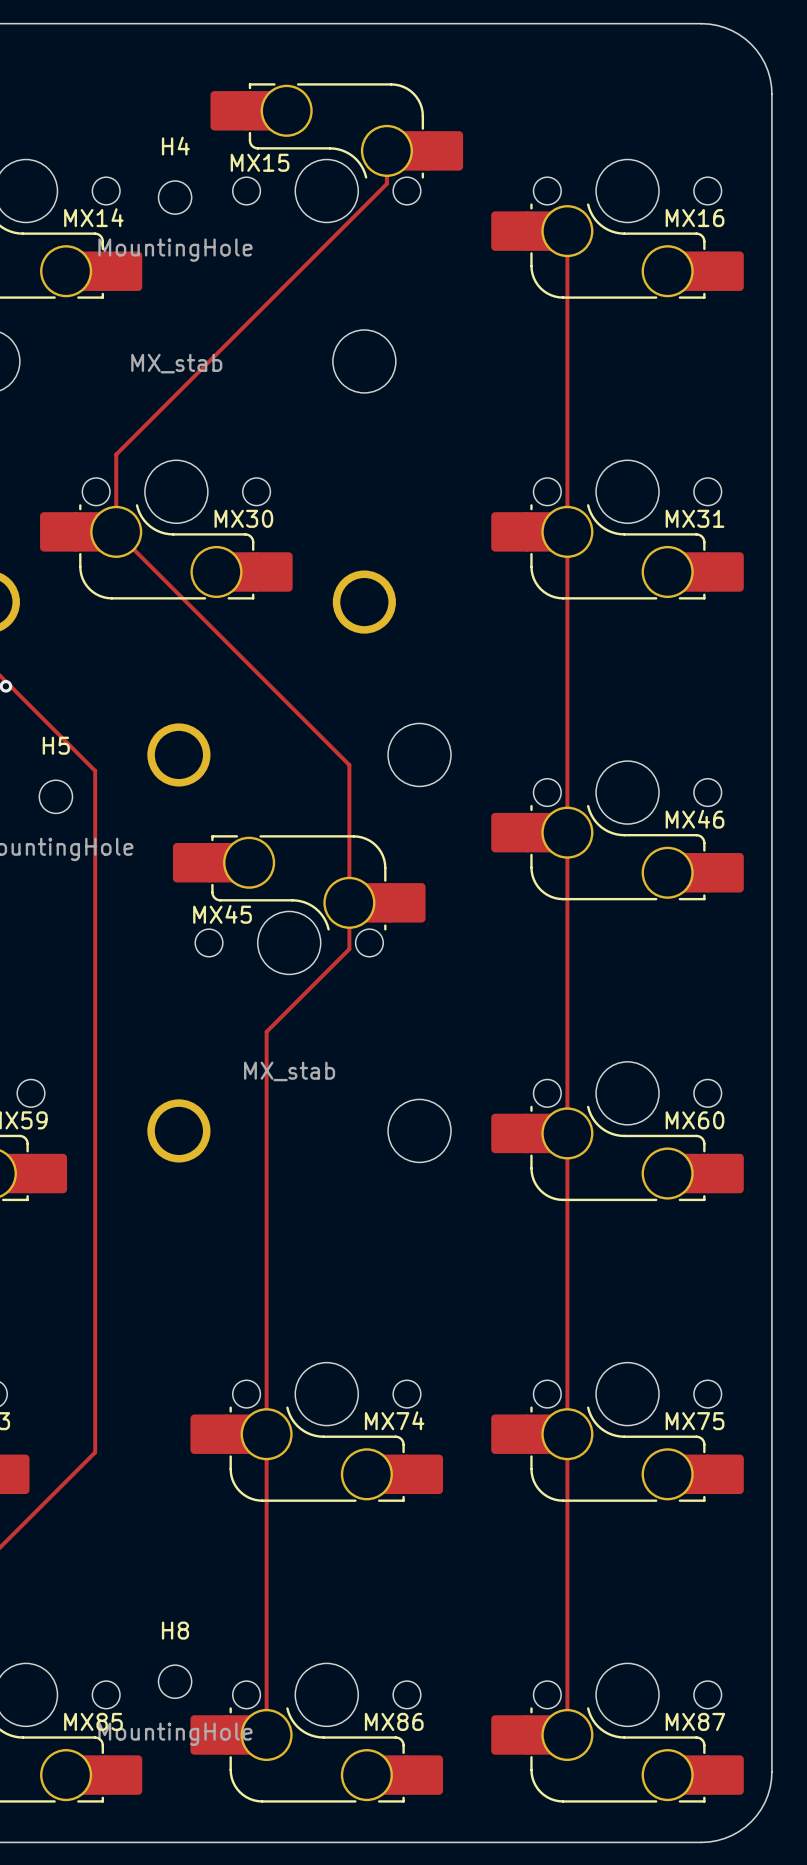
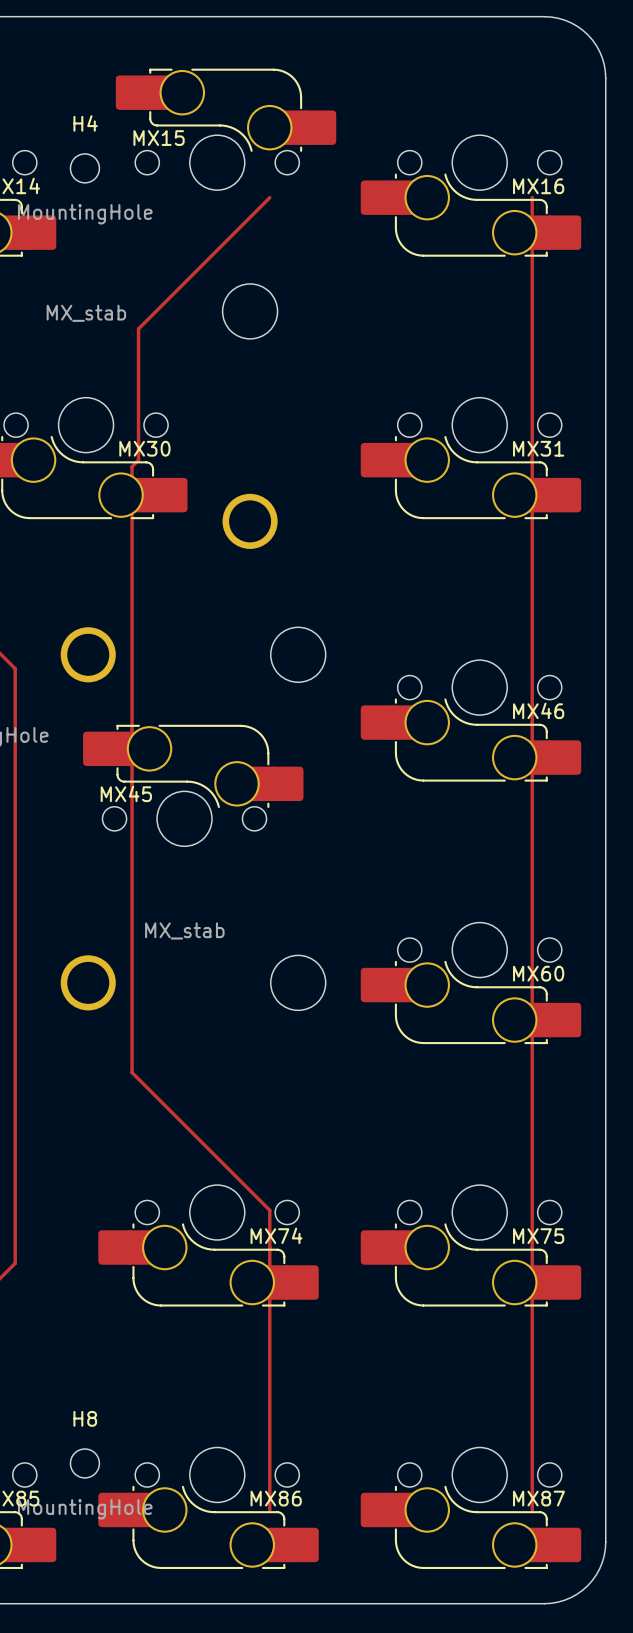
track: (386, 150) (386, 183) (116, 454) (116, 531) (349, 765) (349, 949) (266, 1031) (266, 1734) -> none
track: none -> (269, 197) (138, 328) (138, 460) (132, 466) (132, 1072) (269, 1210) (269, 1509)
track: (567, 231) (567, 1734) -> (532, 197) (532, 1509)

